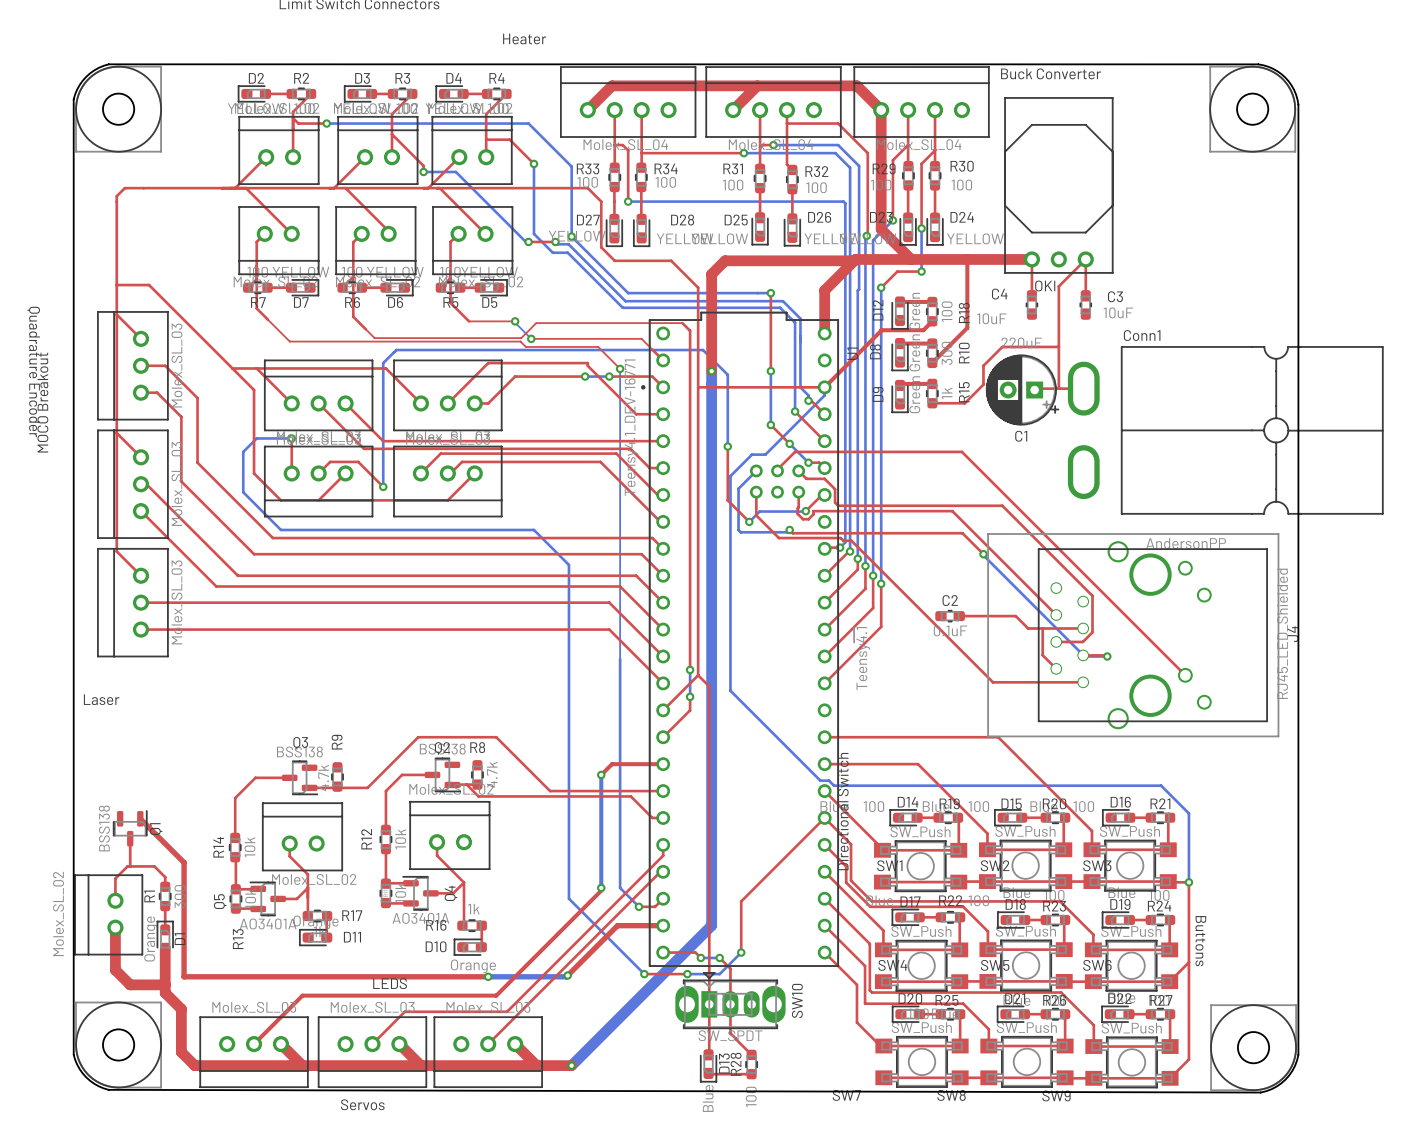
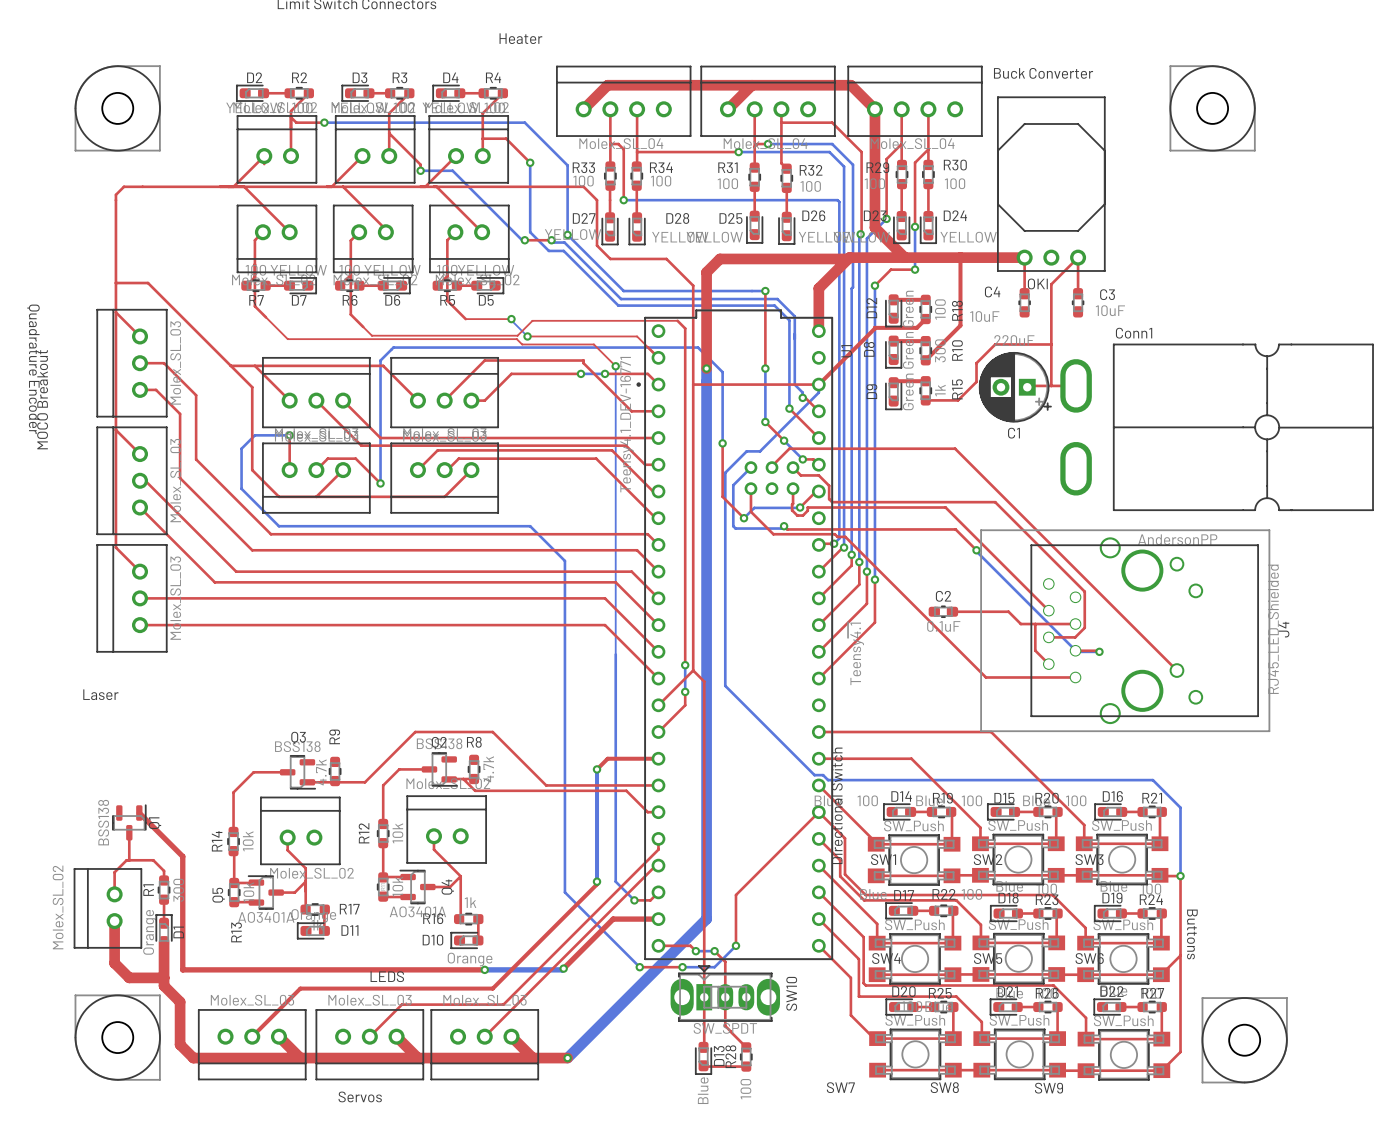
board edge: (108, 64) (1258, 64) (1272, 68) (1281, 74) (1294, 90) (1298, 104) (1298, 1054) (1289, 1075) (1276, 1086) (1260, 1092) (108, 1089) (90, 1080) (79, 1069) (73, 1054) (73, 99) (79, 84) (86, 76) (98, 67) (108, 64) -> none
part position: (1252, 109) -> (1212, 108)

